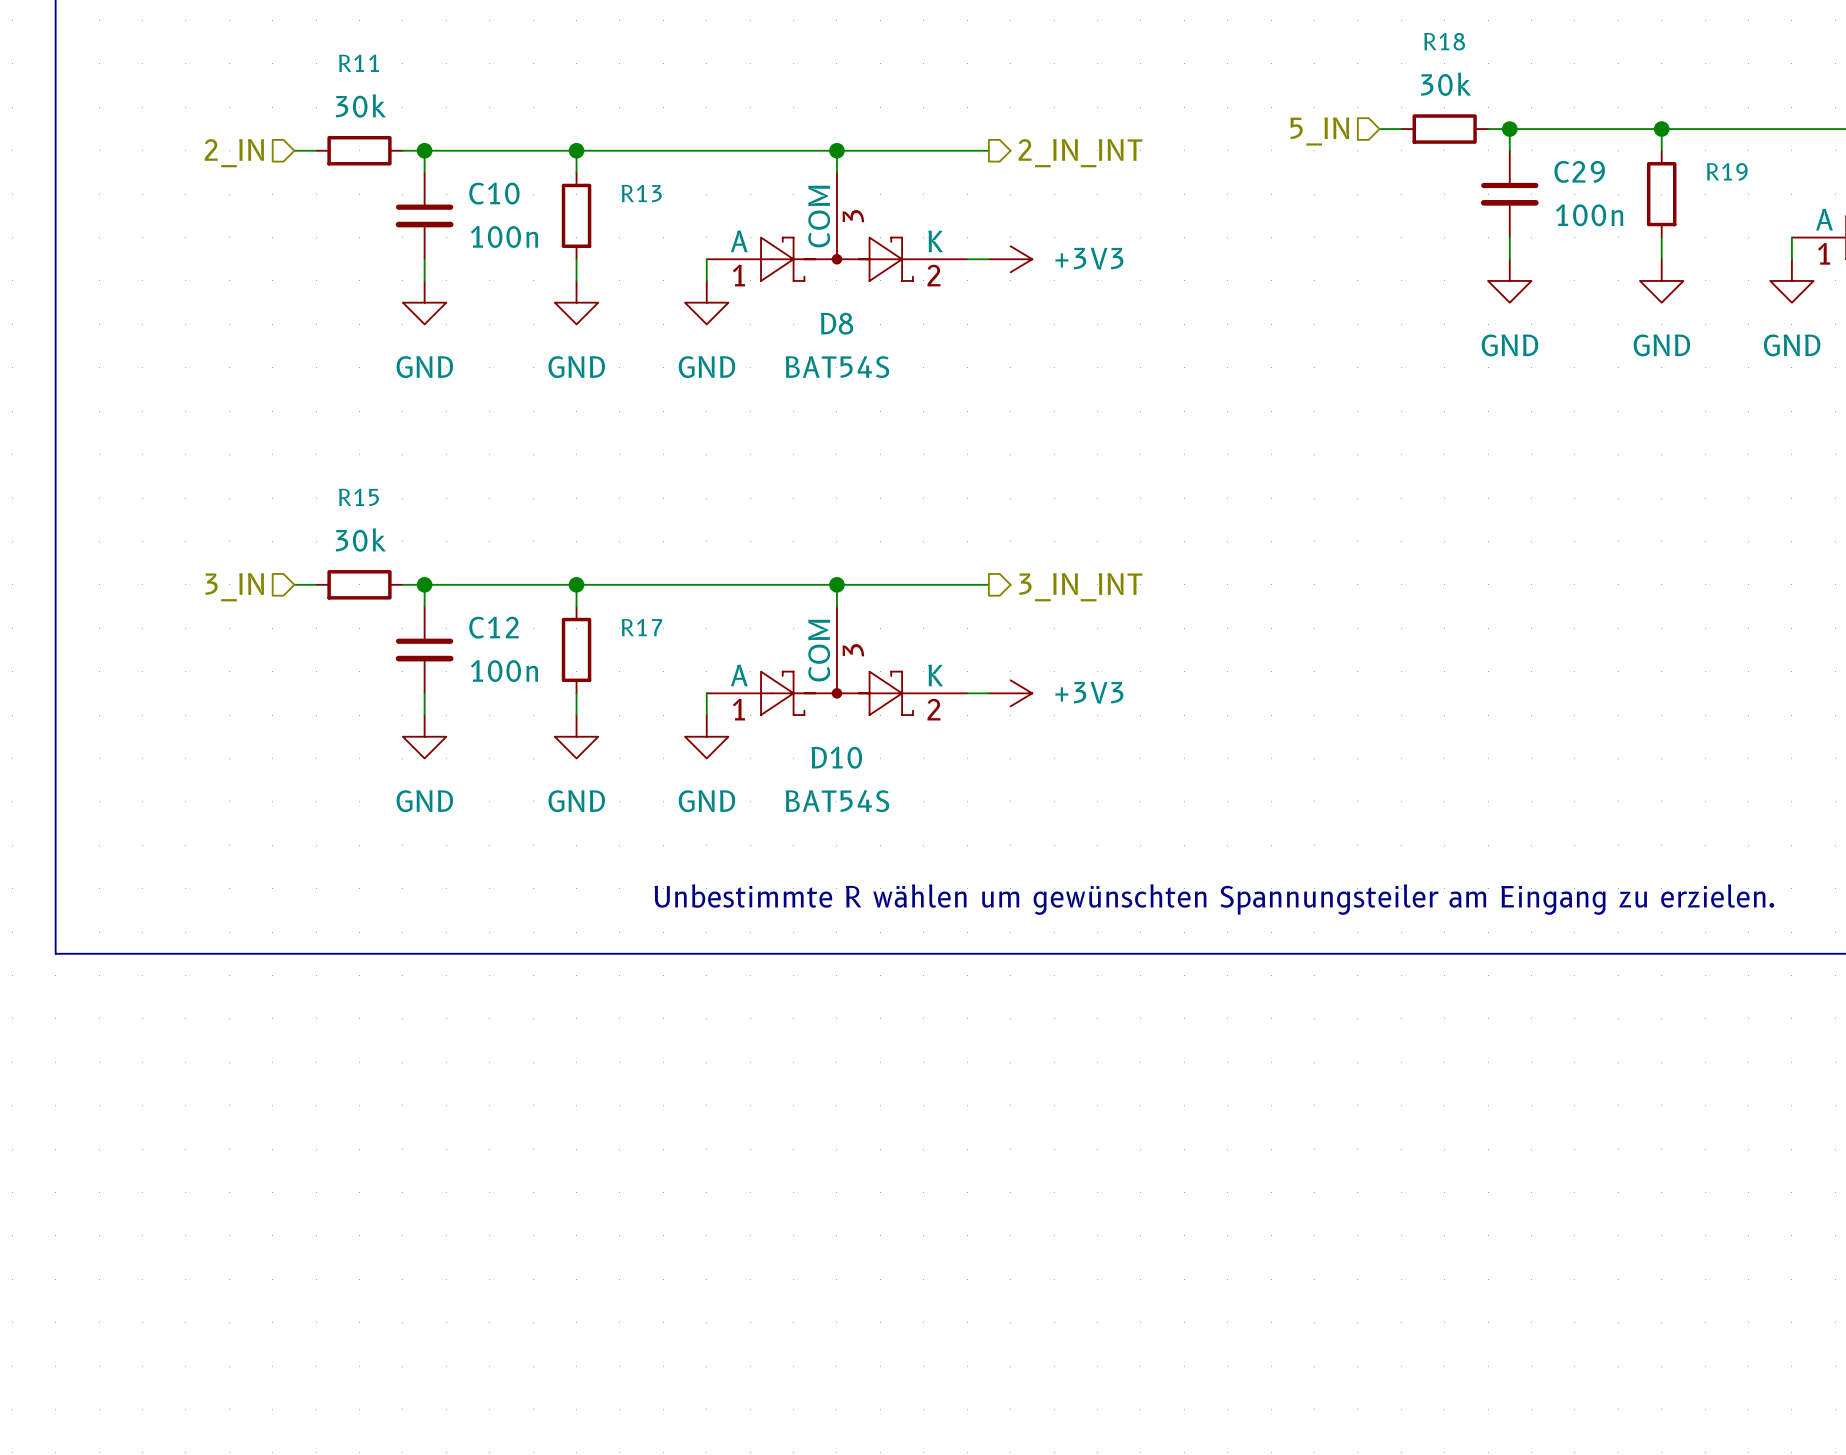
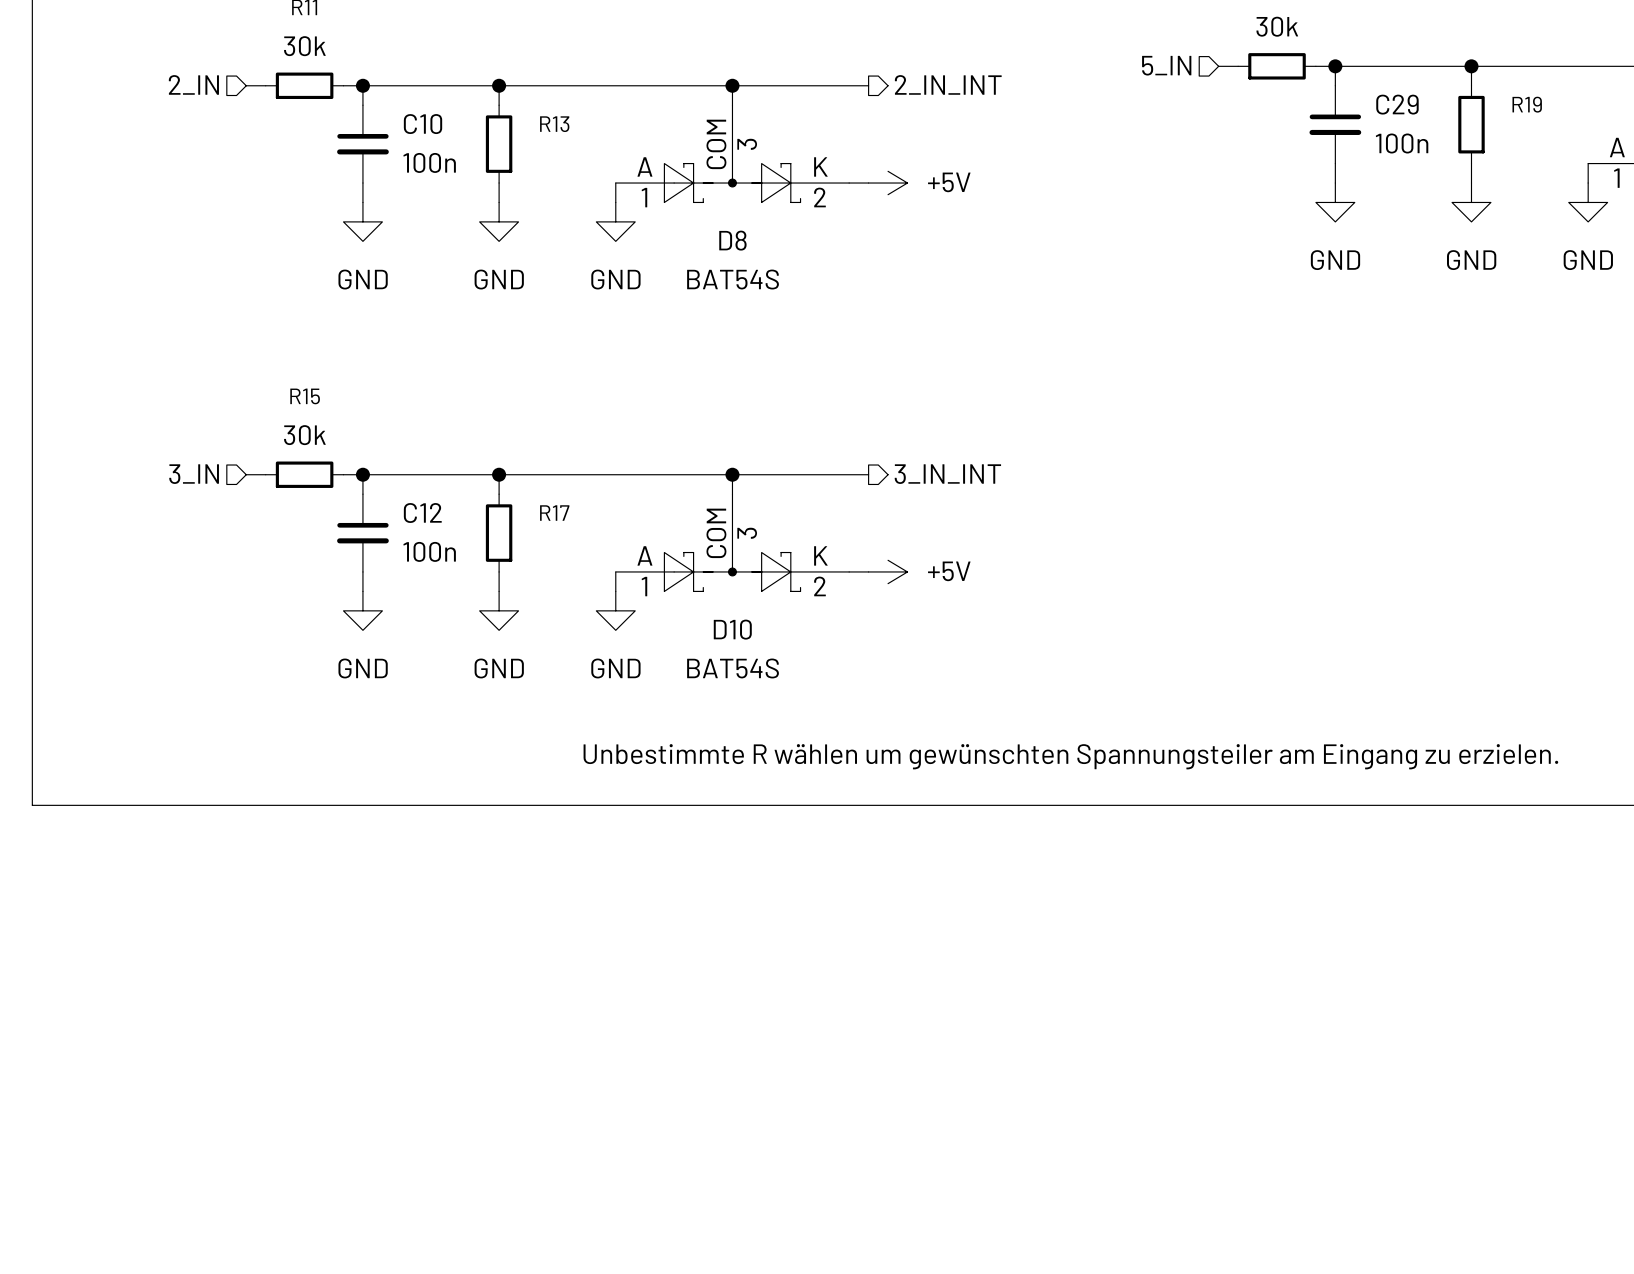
power symbol: +3V3 (1010, 259) -> +5V (888, 183)
power symbol: +3V3 (1010, 693) -> +5V (888, 571)

